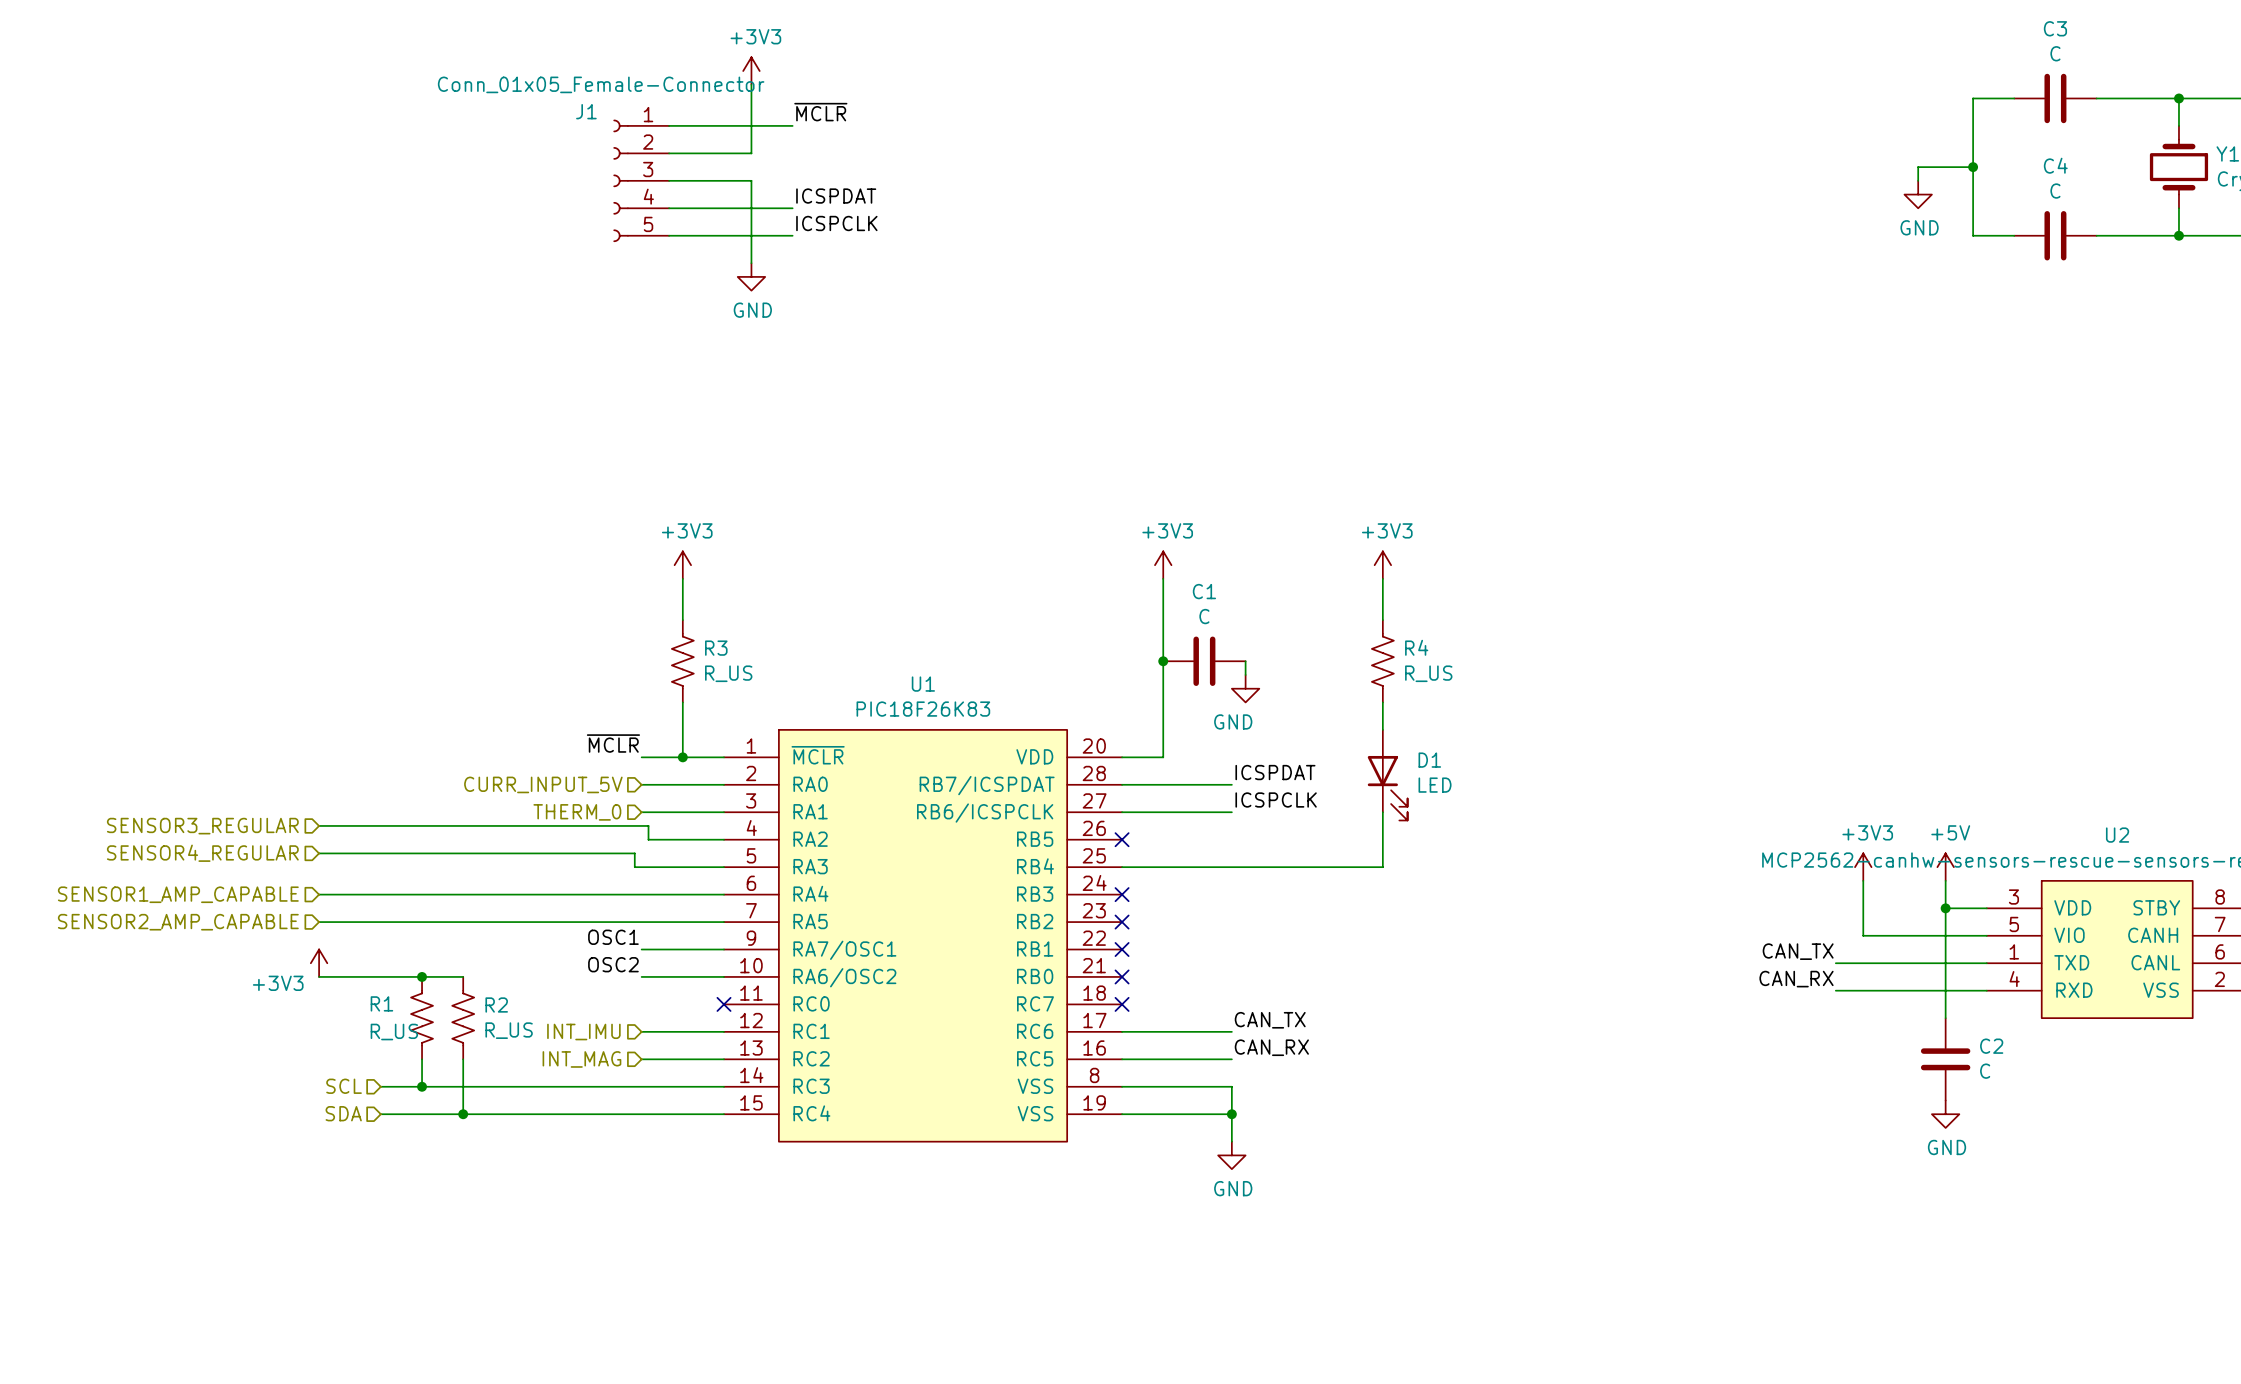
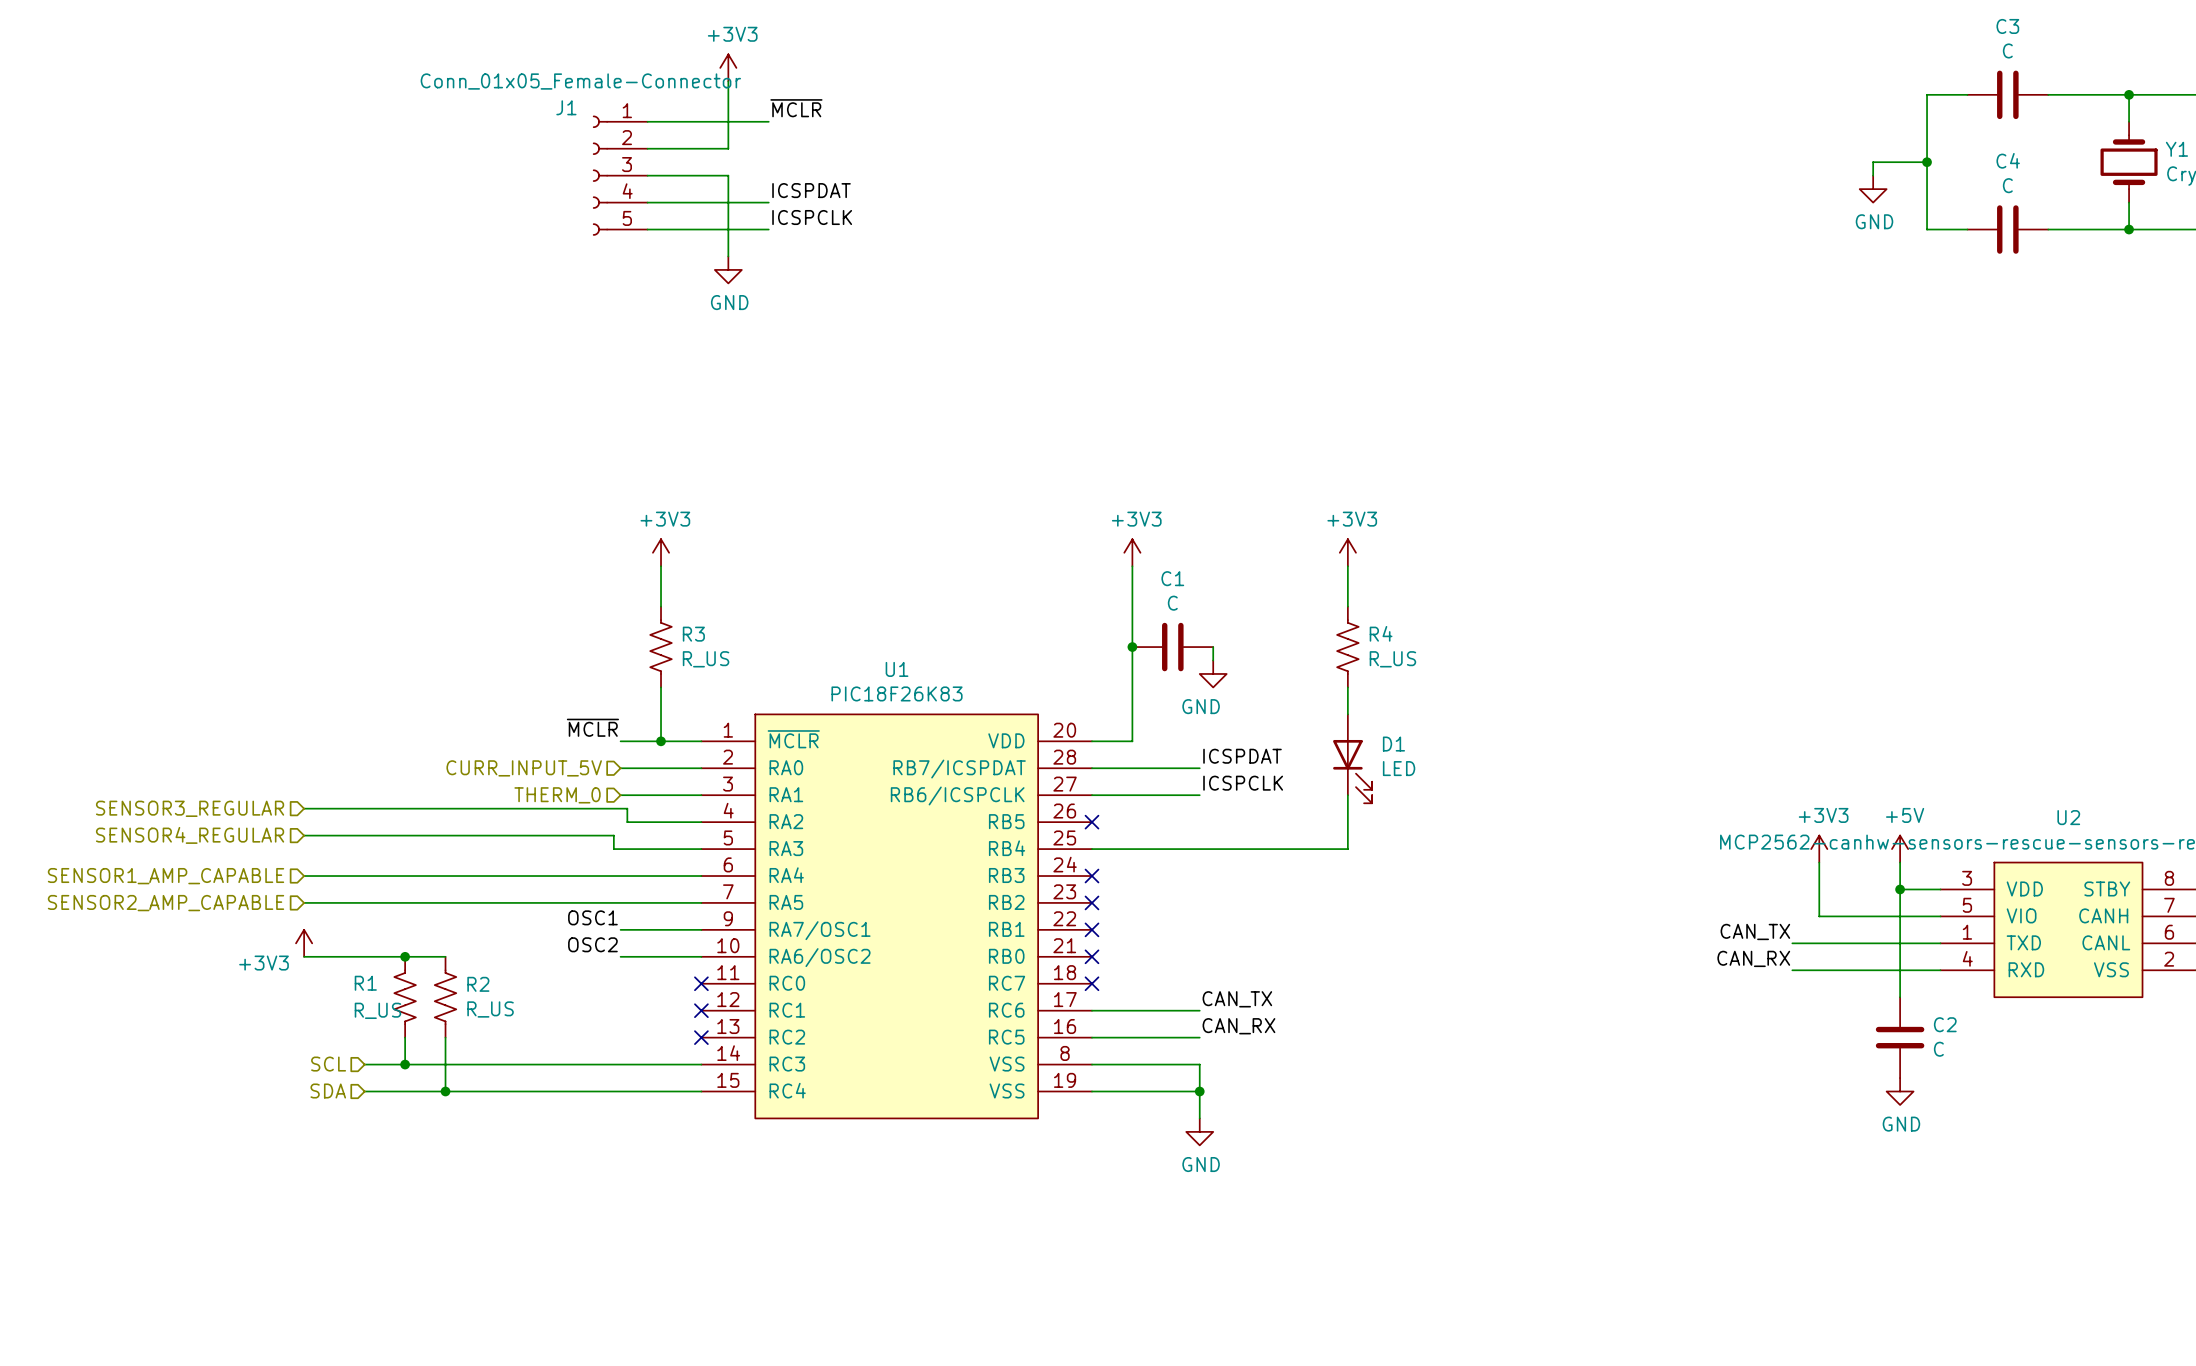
wire: (641, 1031) (724, 1031) -> none
no-connect mark: none -> (701, 1010)
hierarchical label: INT_IMU (583, 1032) -> none
hierarchical label: INT_MAG (581, 1059) -> none
wire: (641, 1059) (724, 1059) -> none
no-connect mark: none -> (701, 1037)

